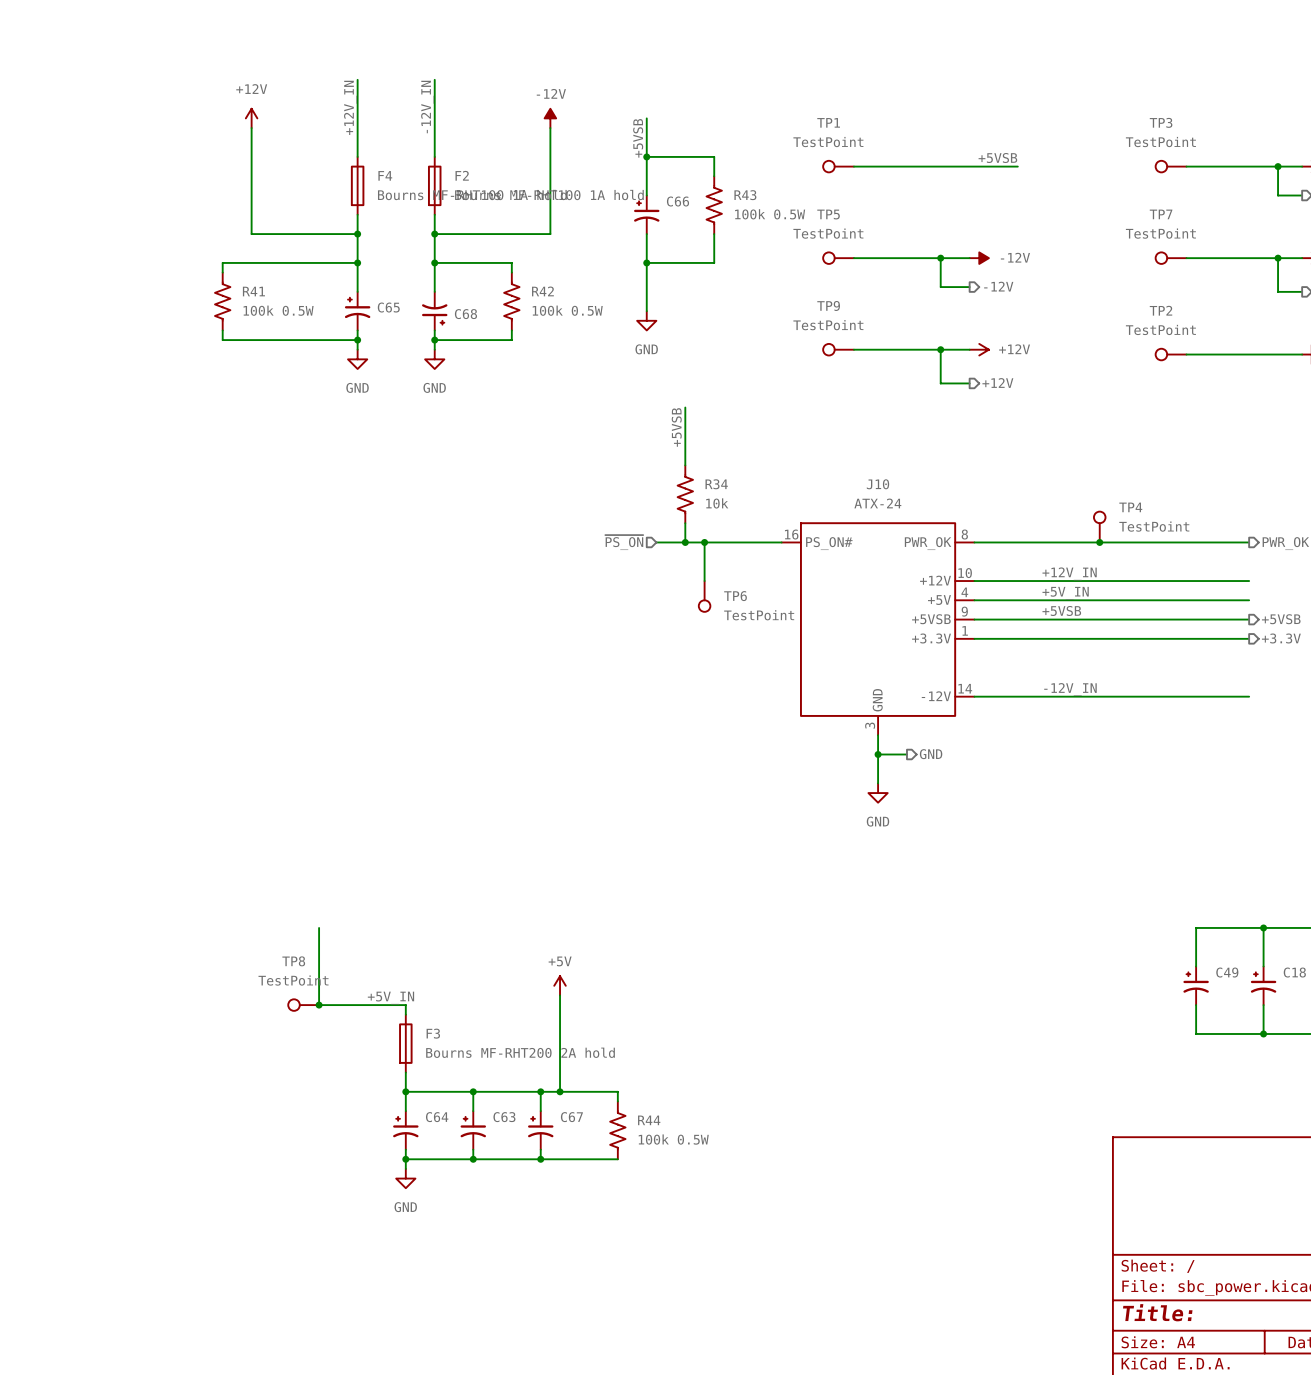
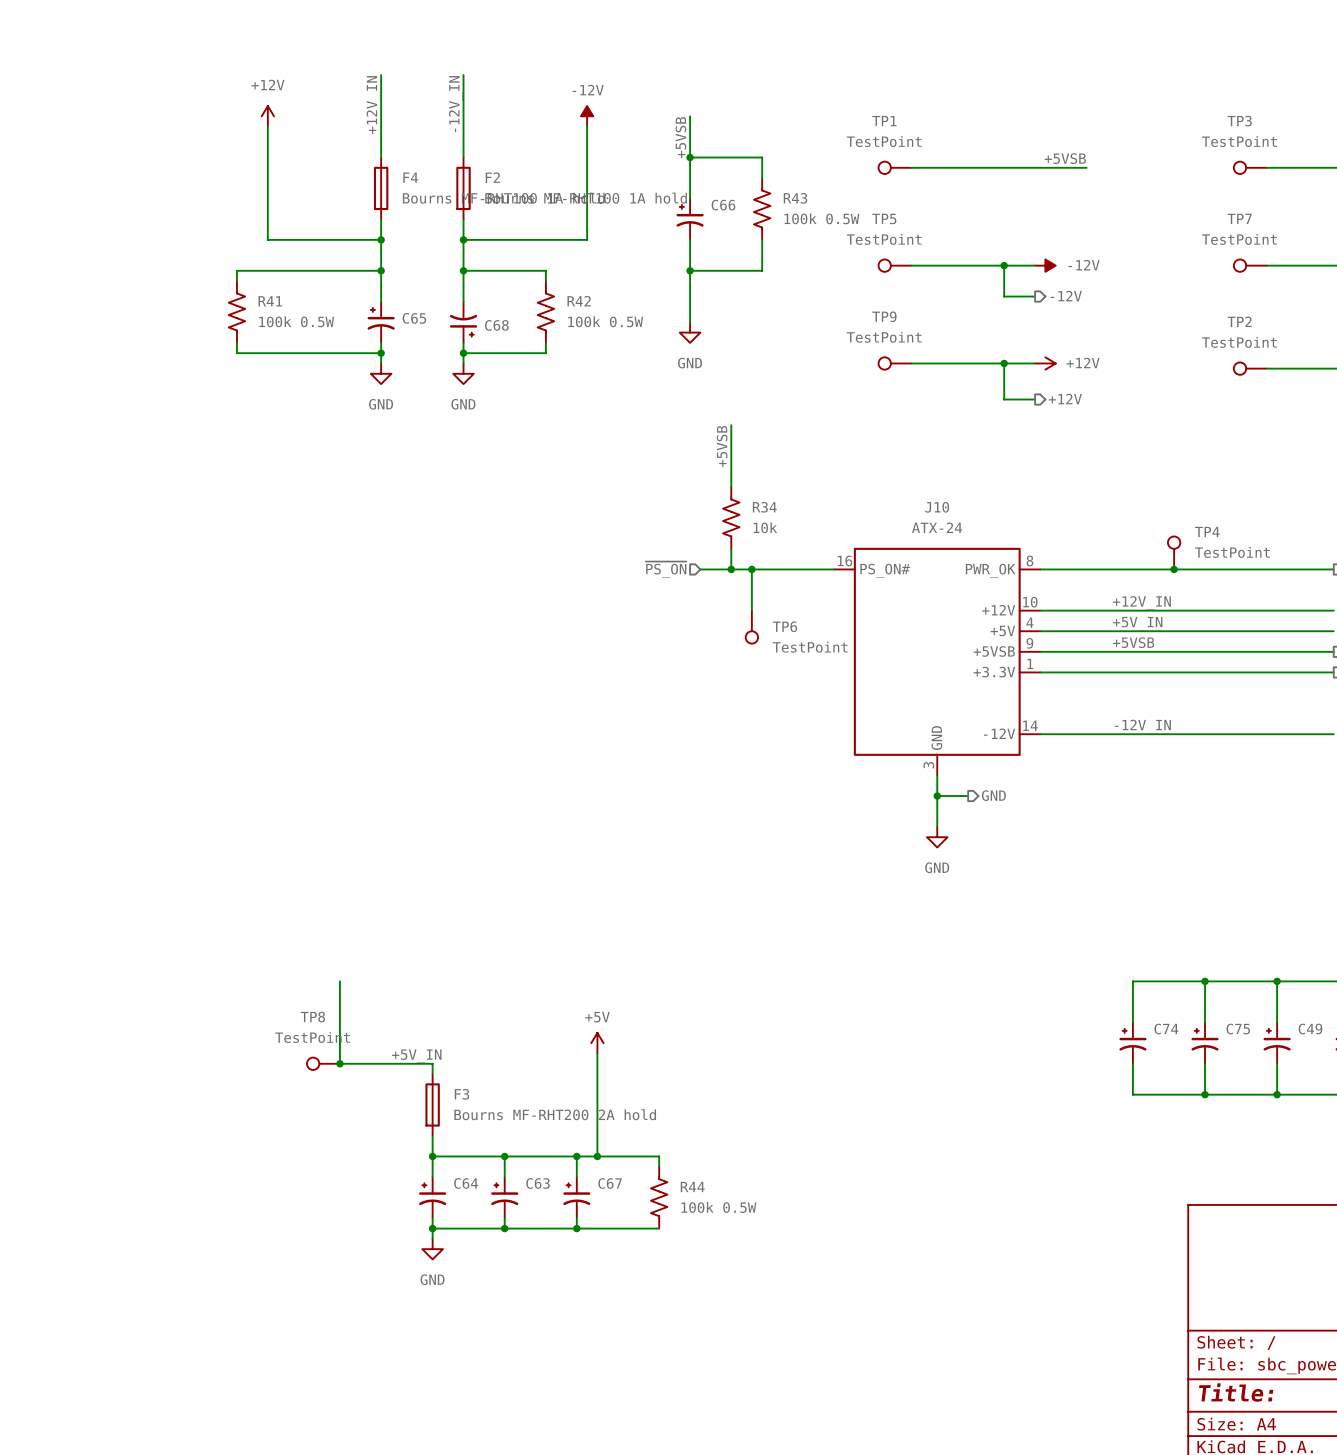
wire: none -> (1205, 981) (1205, 1022)
junction: none -> (1205, 981)
wire: none -> (1277, 981) (1132, 981) (1132, 1022)
junction: none -> (1277, 981)
C74: none -> (1132, 1043)
C75: none -> (1205, 1043)
wire: none -> (1132, 1063) (1132, 1094) (1277, 1094)
wire: none -> (1205, 1063) (1205, 1094)
junction: none -> (1205, 1094)
junction: none -> (1277, 1094)

